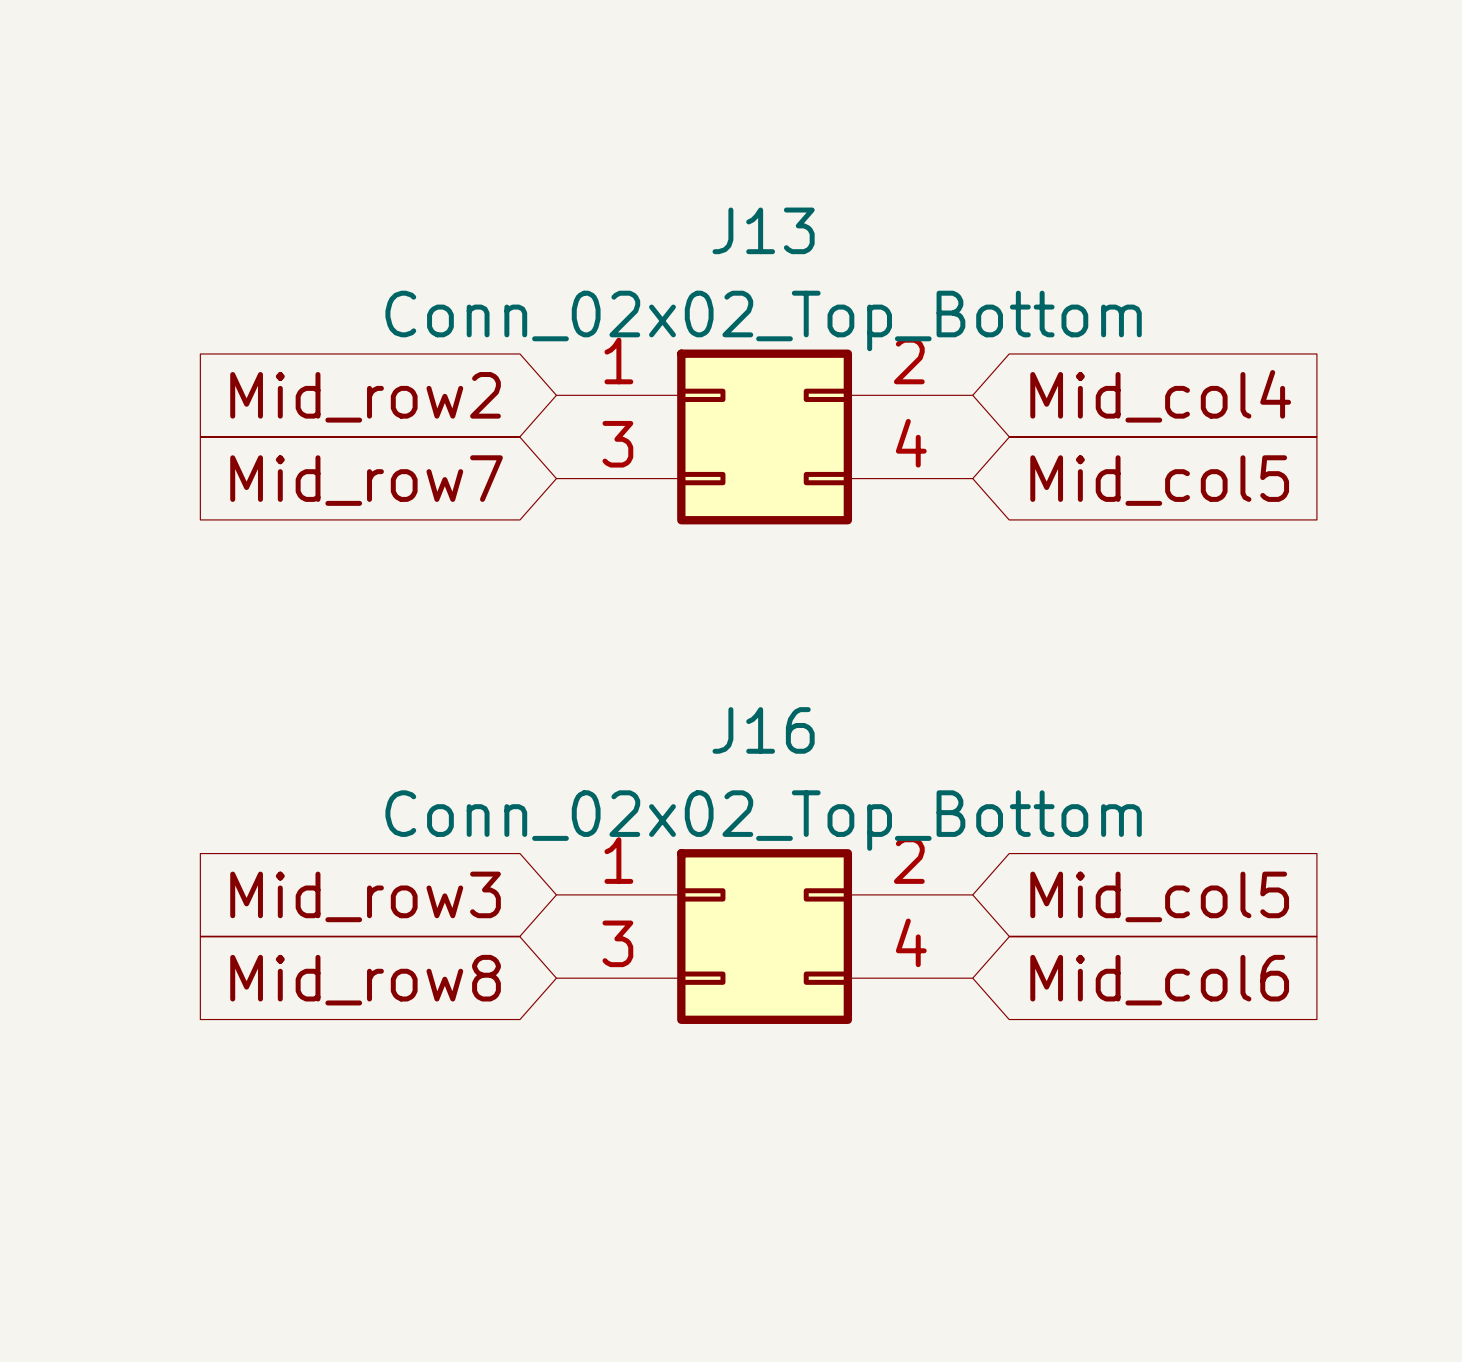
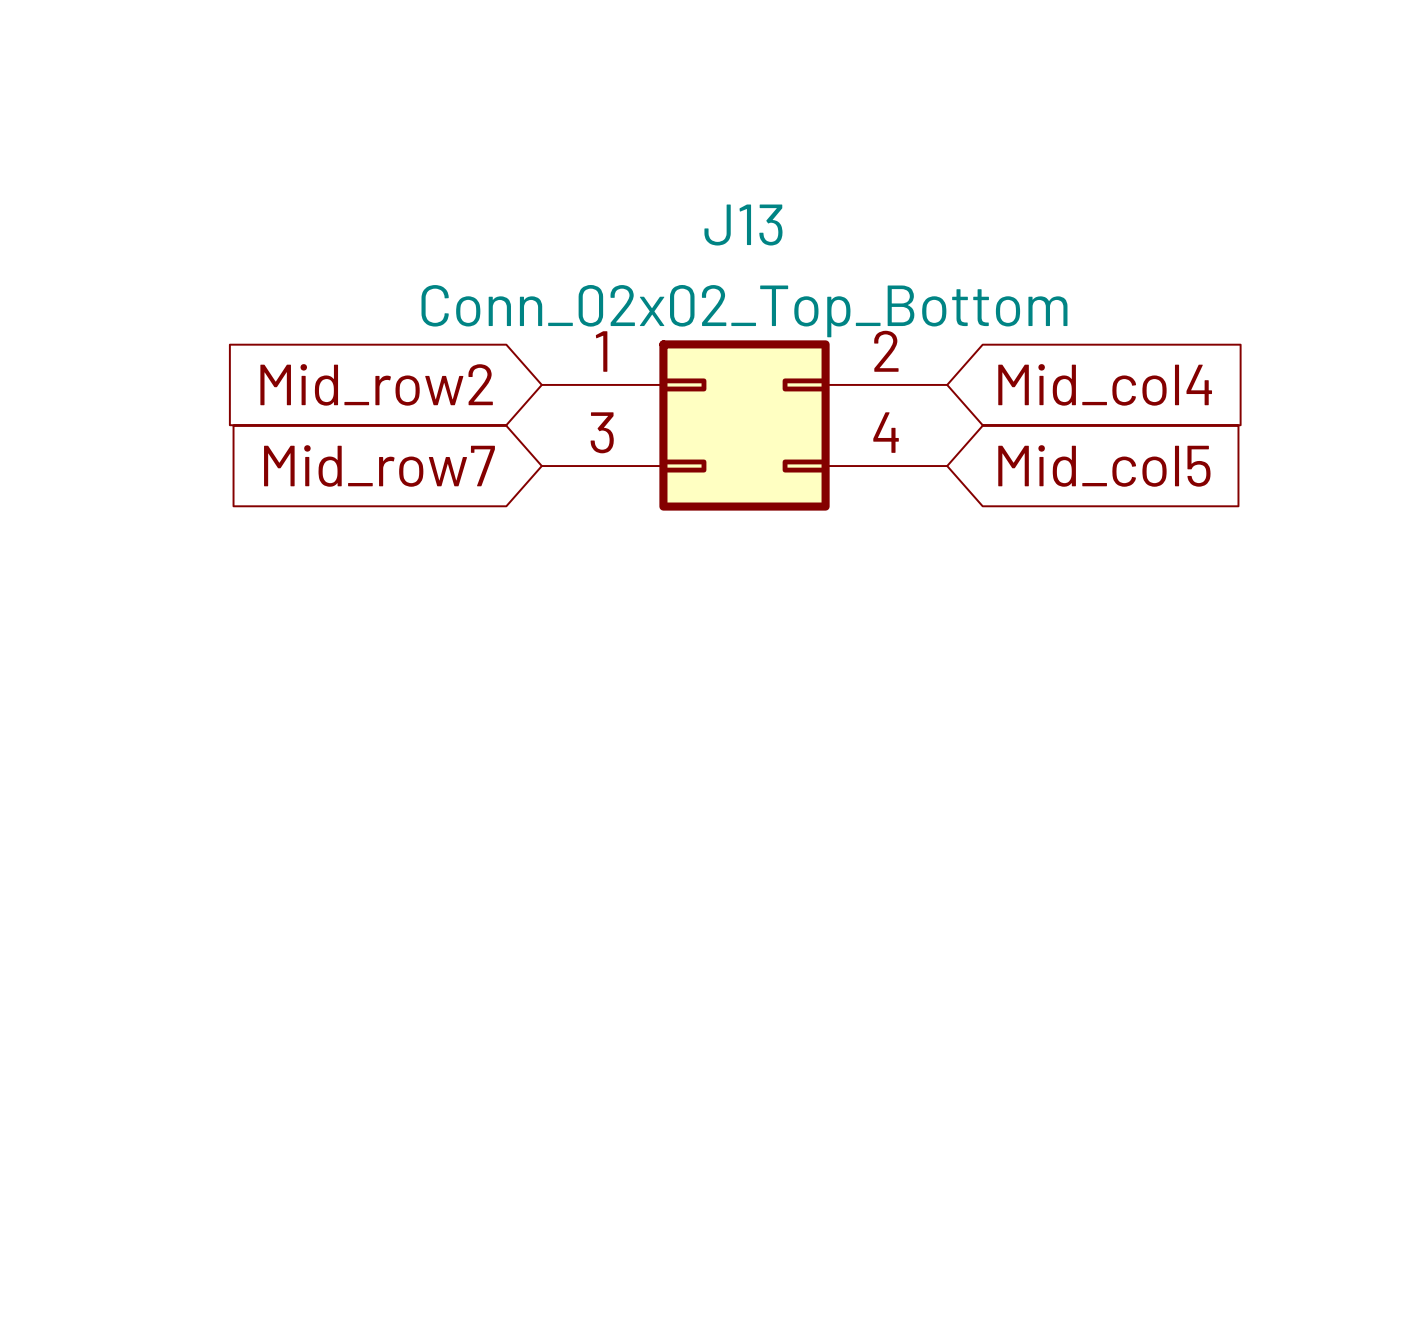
global label: Mid_row3 (365, 896) -> none
global label: Mid_col5 (1159, 896) -> none
J16: Conn_02x02_Top_Bottom (764, 936) -> none
global label: Mid_row8 (365, 980) -> none
global label: Mid_col6 (1159, 980) -> none

